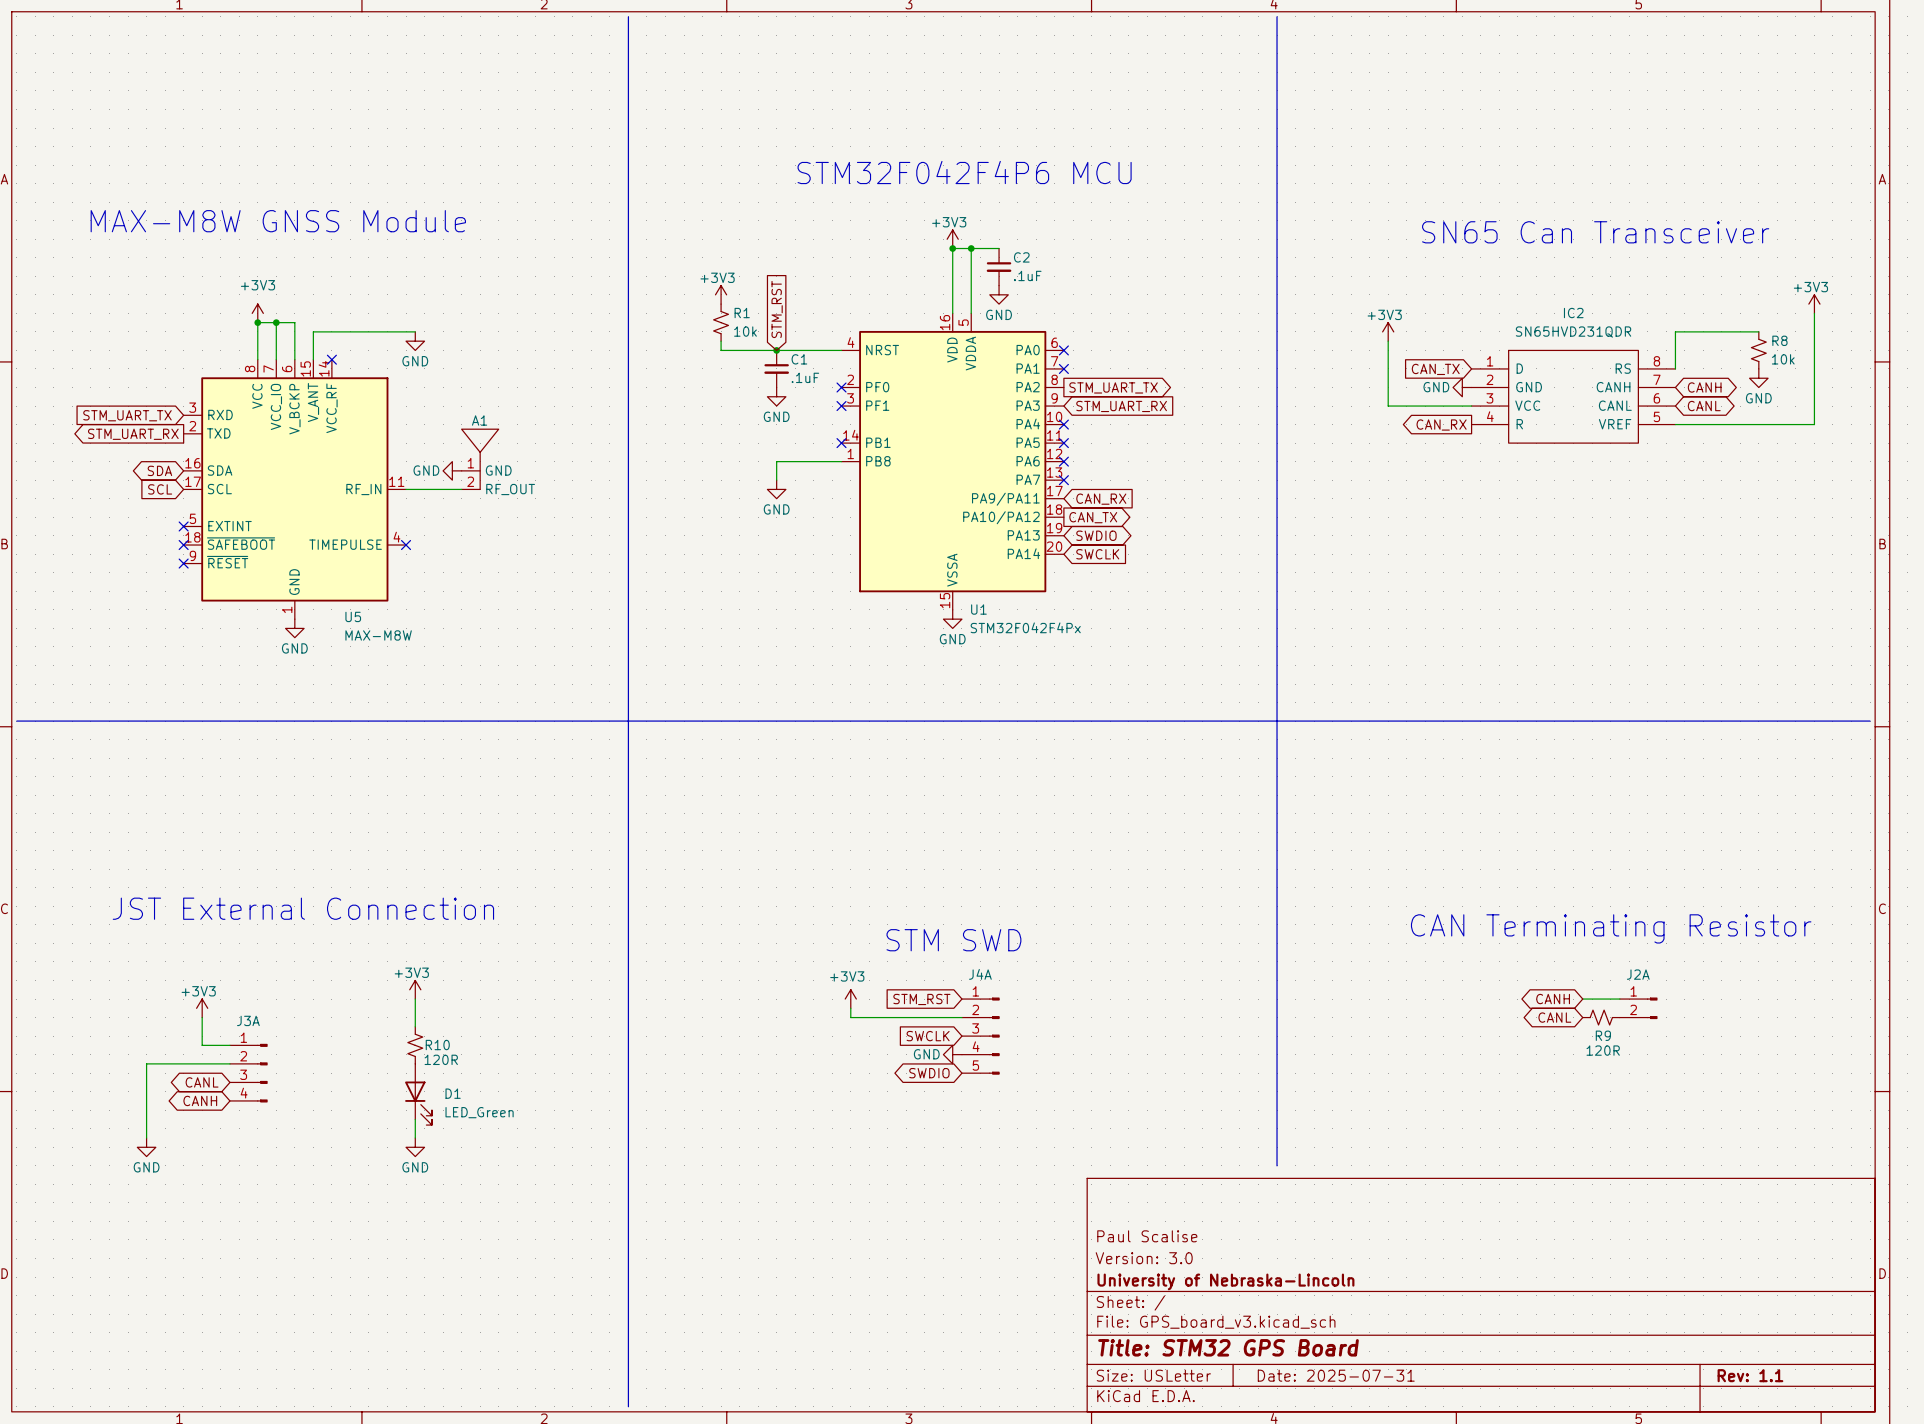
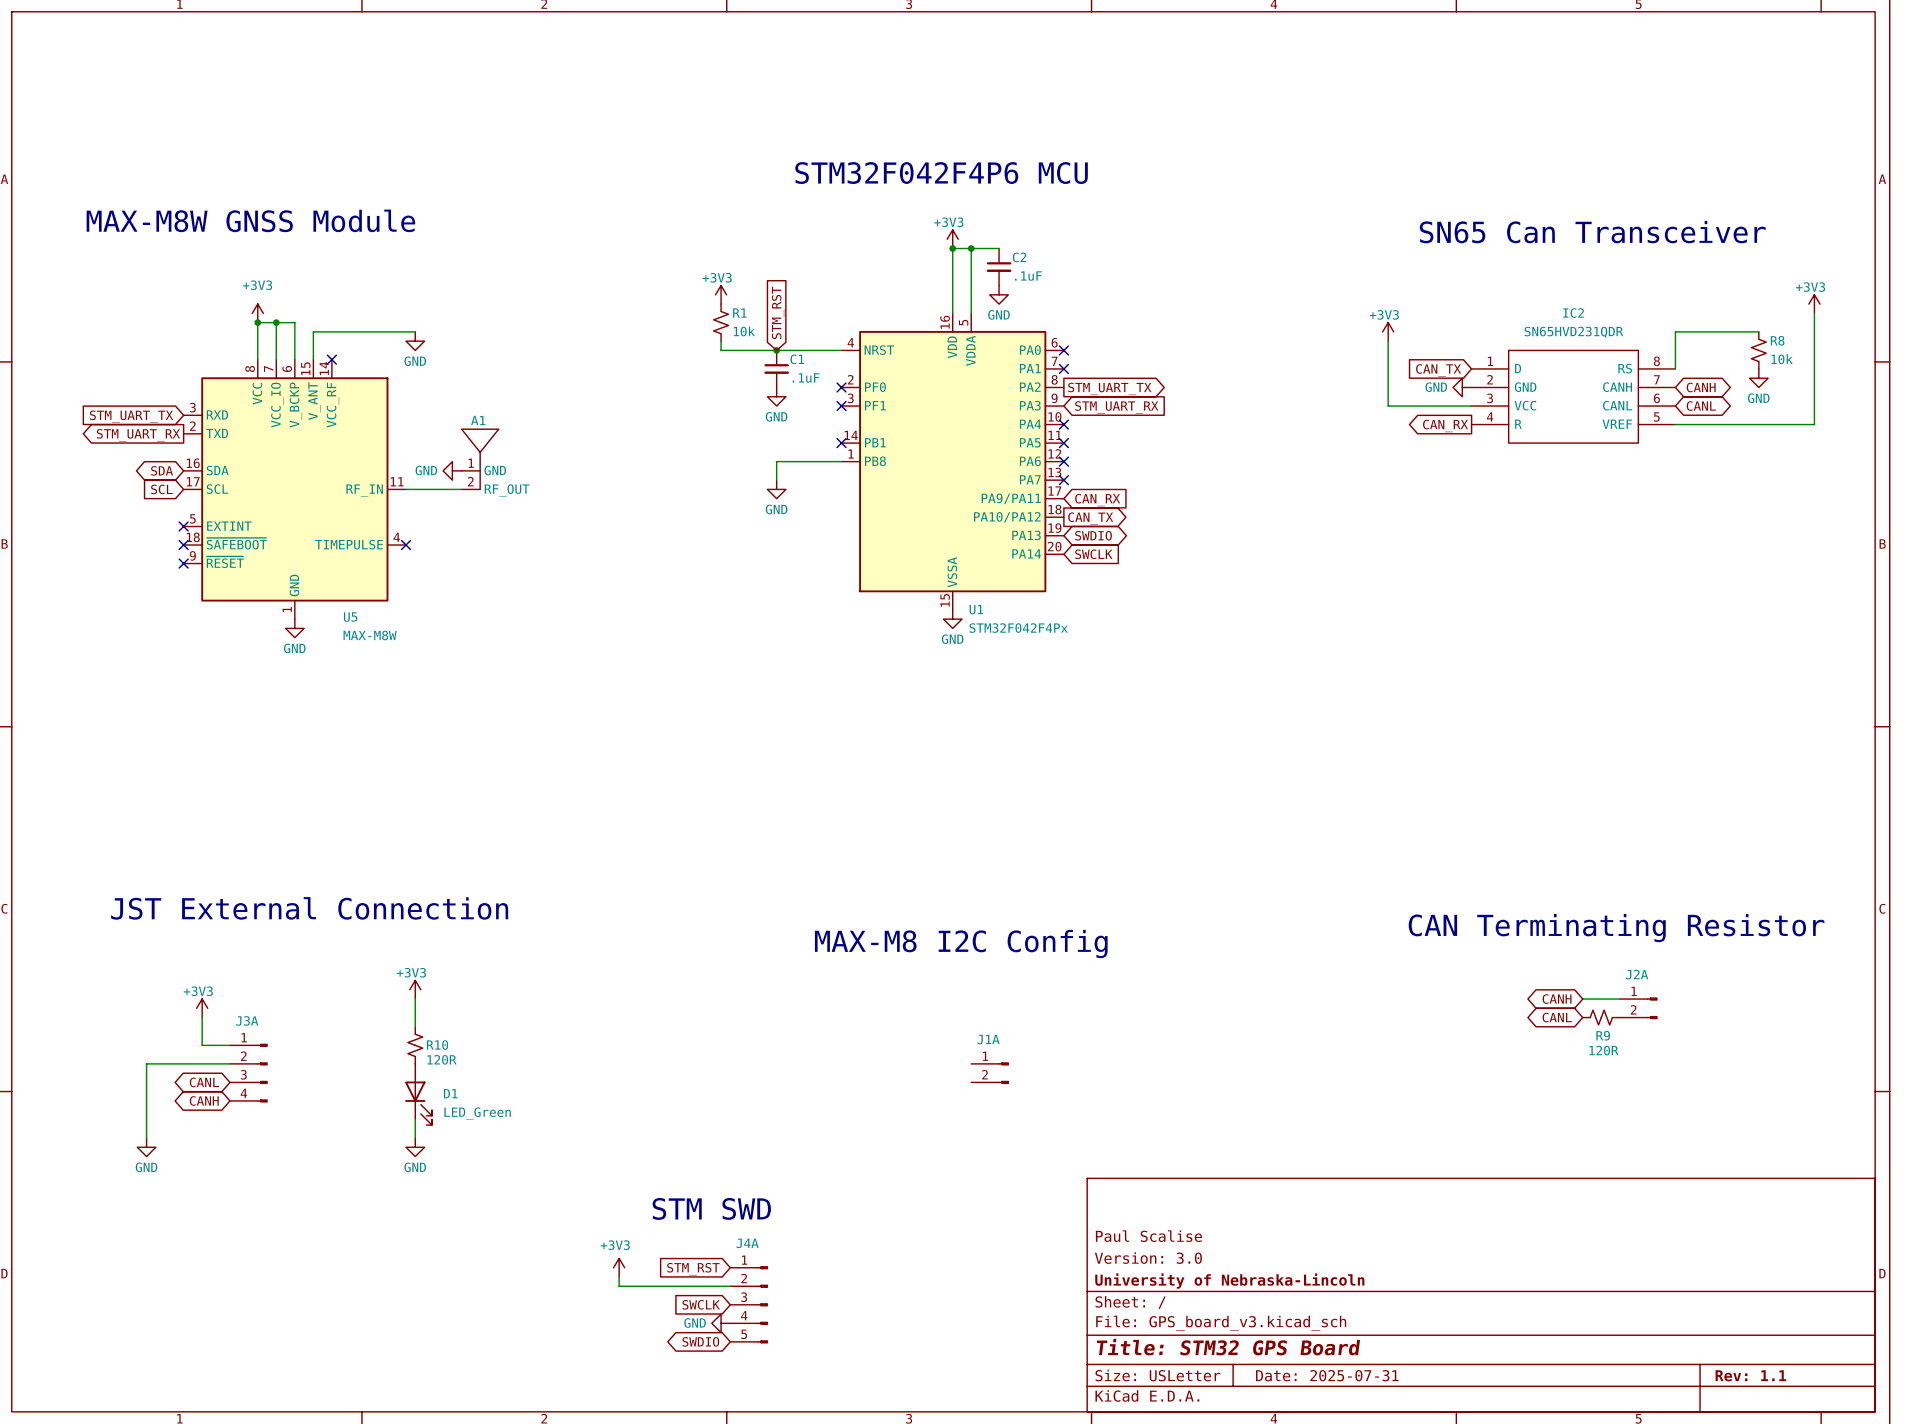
line: (628, 16) (628, 1406) -> none
line: (1277, 16) (1277, 1165) -> none
line: (16, 721) (1870, 721) -> none
text: STM SWD (953, 940) -> none
text: none -> MAX-M8 I2C Config (961, 943)
power symbol: +3V3 (850, 999) -> none
global label: STM_RST (921, 999) -> none
wire: (850, 1008) (850, 1017) (961, 1017) -> none
global label: SWCLK (928, 1036) -> none
J4A position: (980, 1036) -> (749, 1304)
power symbol: GND (952, 1054) -> none
global label: SWDIO (929, 1073) -> none
J1A: none -> (990, 1073)
text: none -> STM SWD (711, 1208)
power symbol: none -> +3V3 (619, 1267)
global label: none -> STM_RST (693, 1269)
wire: none -> (619, 1277) (619, 1286) (730, 1286)
global label: none -> SWCLK (701, 1304)
power symbol: none -> GND (721, 1323)
global label: none -> SWDIO (700, 1341)

